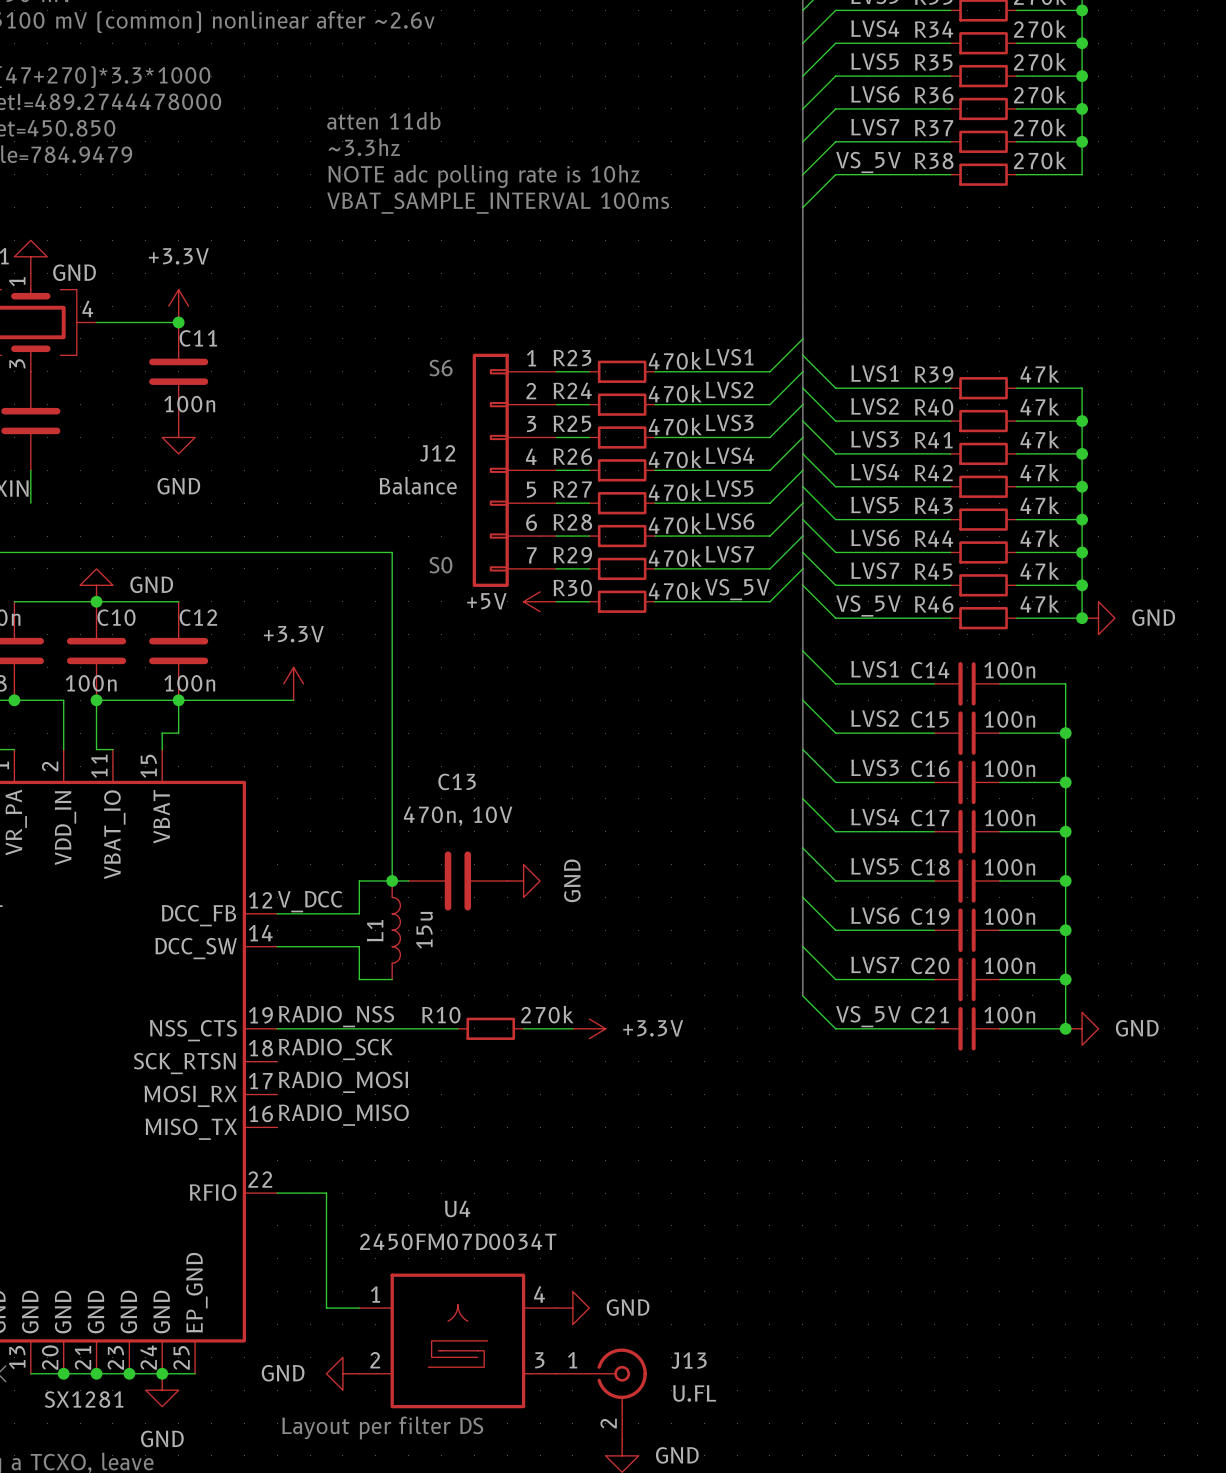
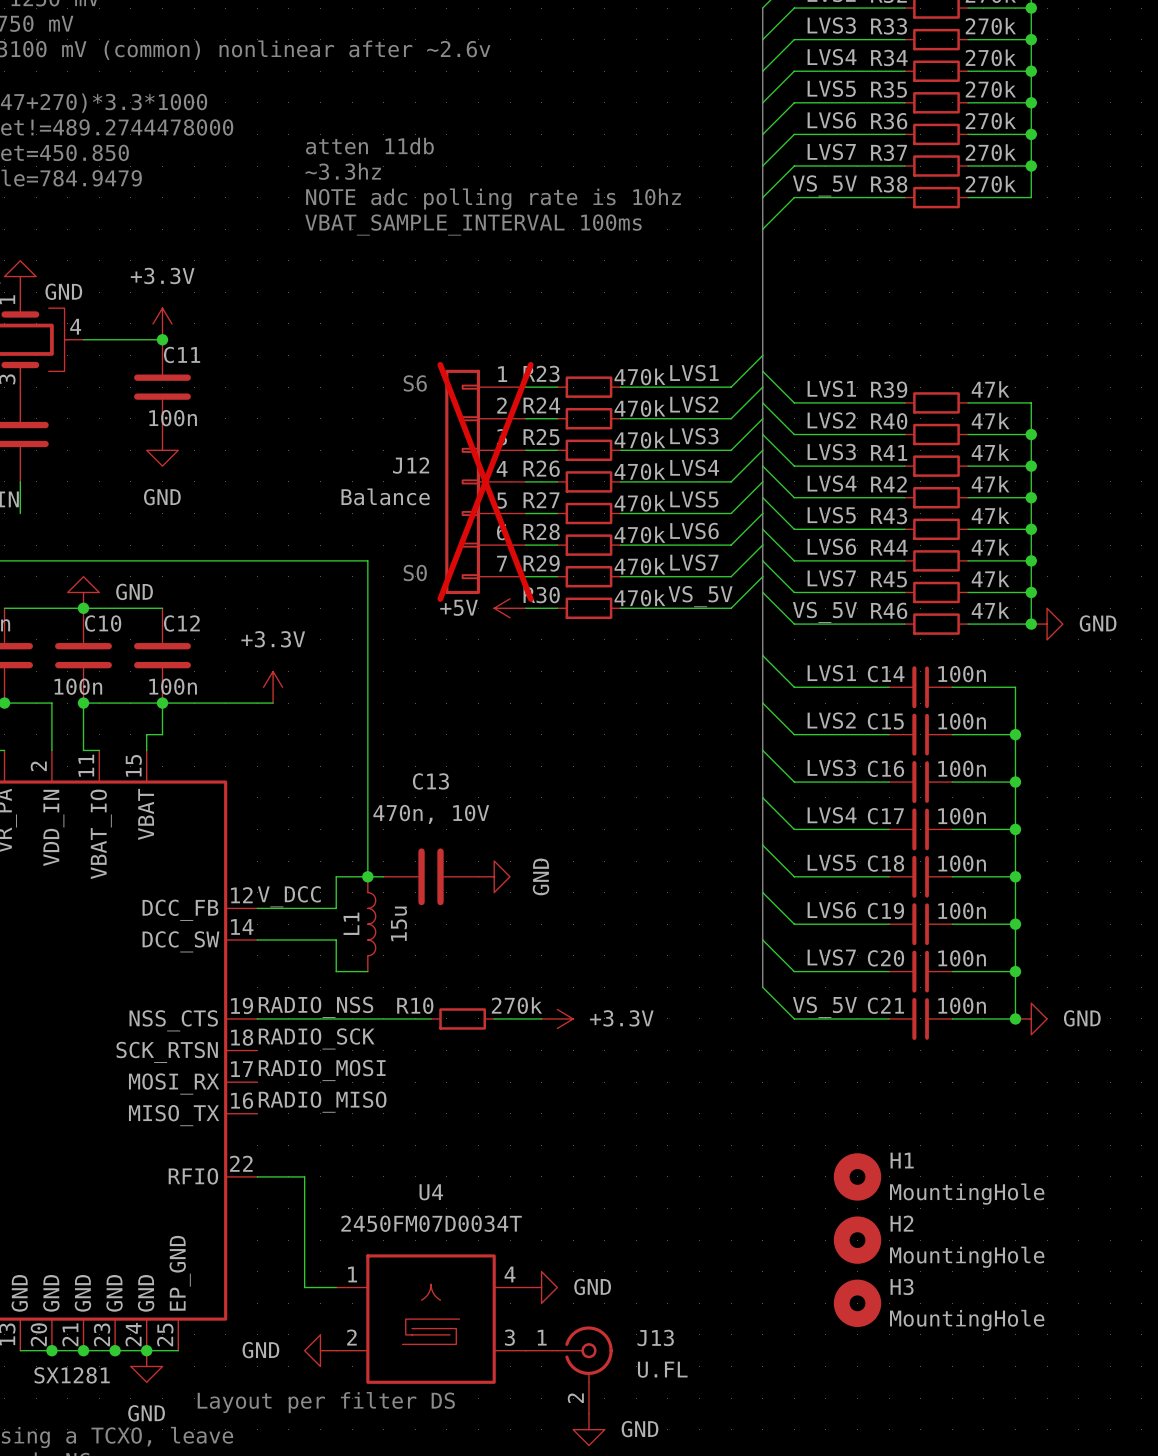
J12 do-not-place cross: none -> (485, 481)
H1: none -> MountingHole (857, 1176)
H2: none -> MountingHole (857, 1240)
H3: none -> MountingHole (857, 1303)

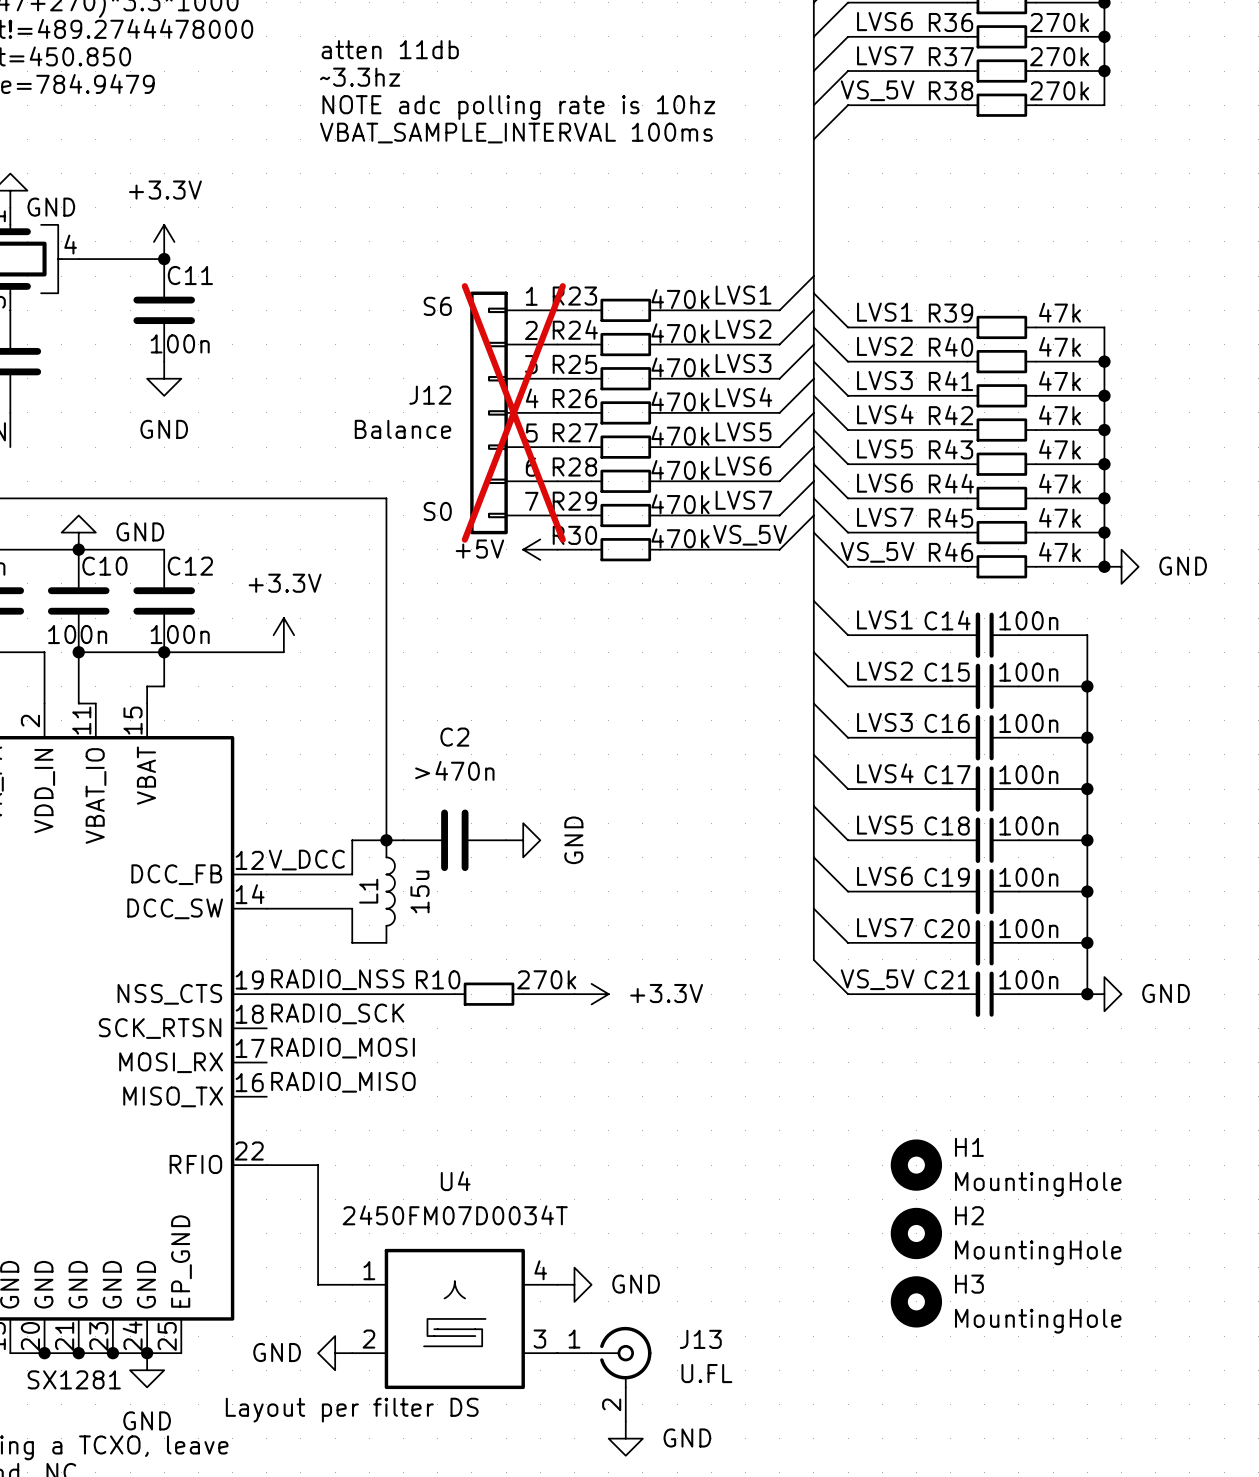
C13 name: C13 (430, 781) -> C2 (454, 737)
C13 value: 470n, 10V (431, 814) -> >470n (454, 770)

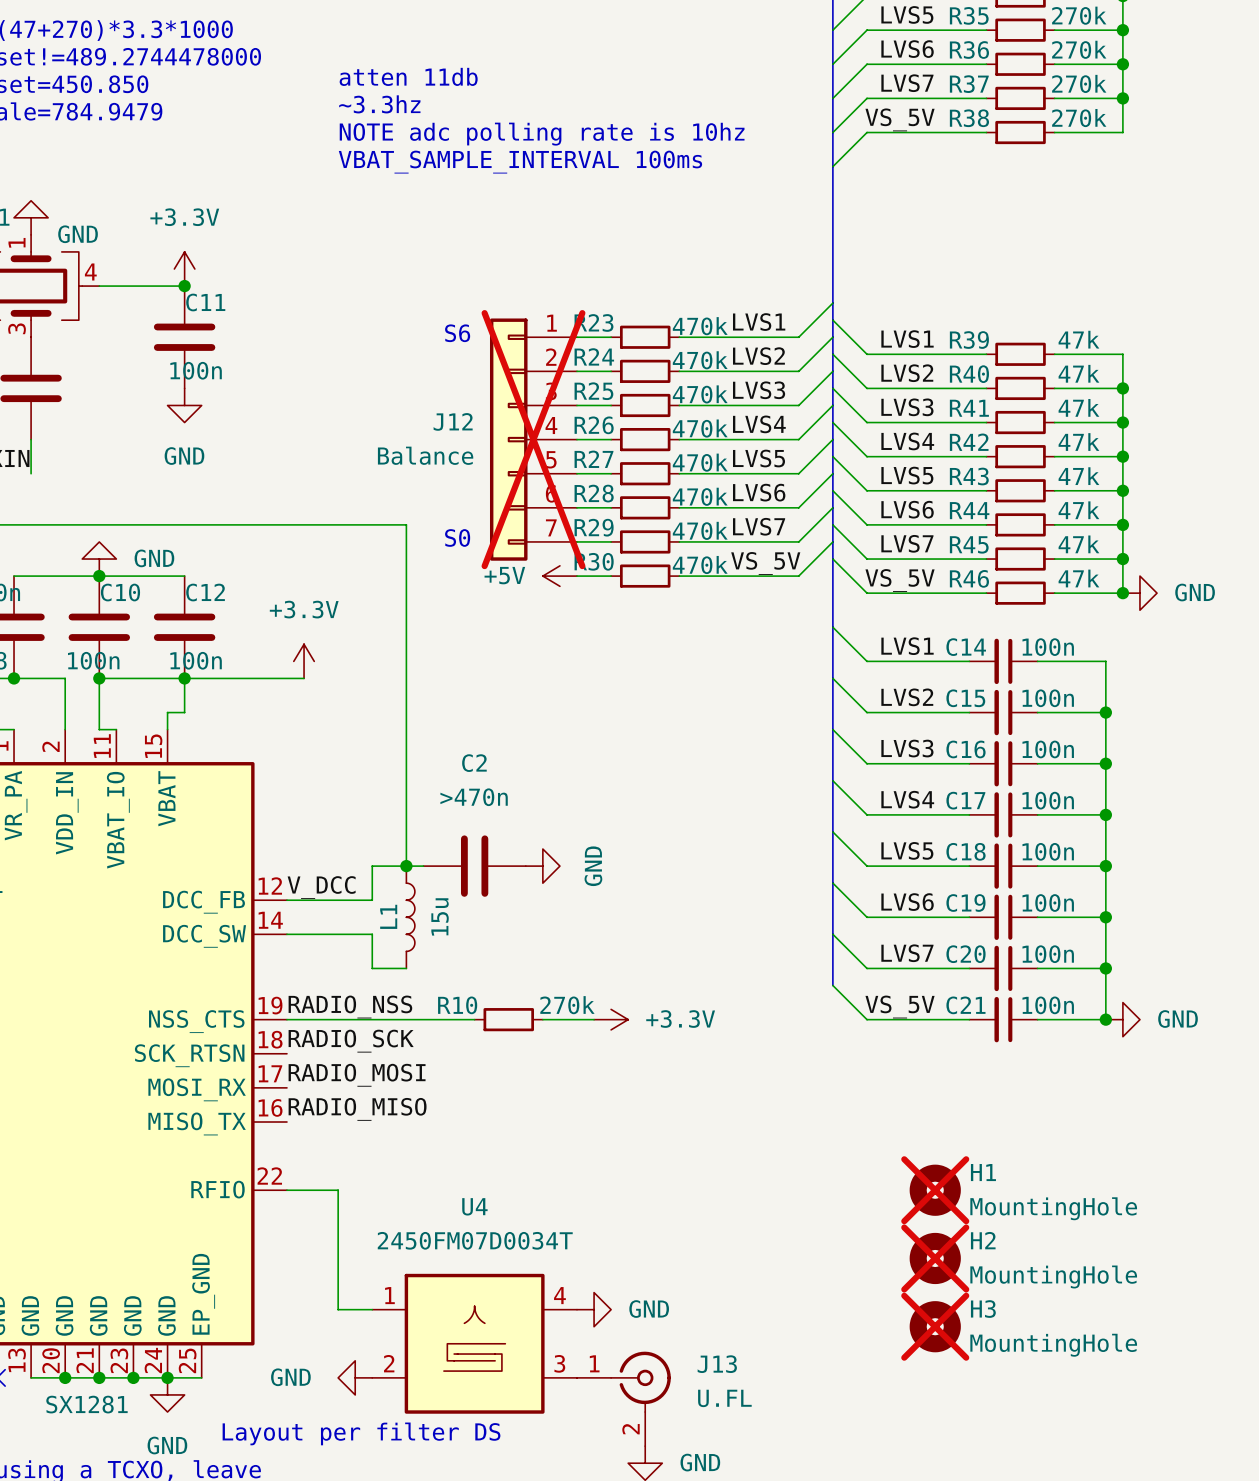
H1 do-not-place cross: none -> (935, 1190)
H2 do-not-place cross: none -> (935, 1258)
H3 do-not-place cross: none -> (935, 1326)

